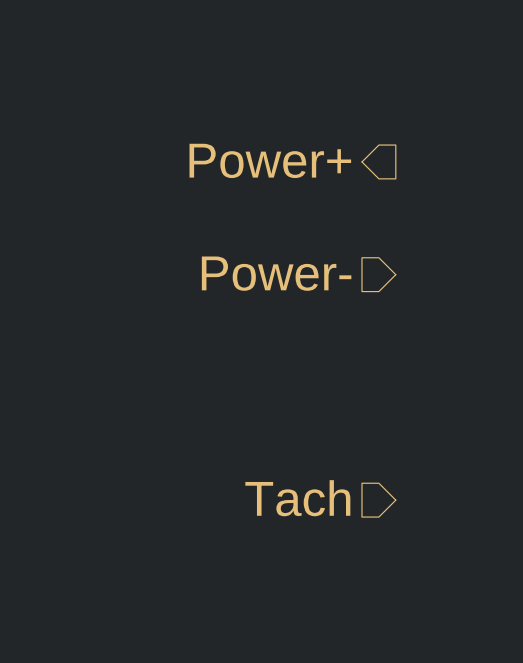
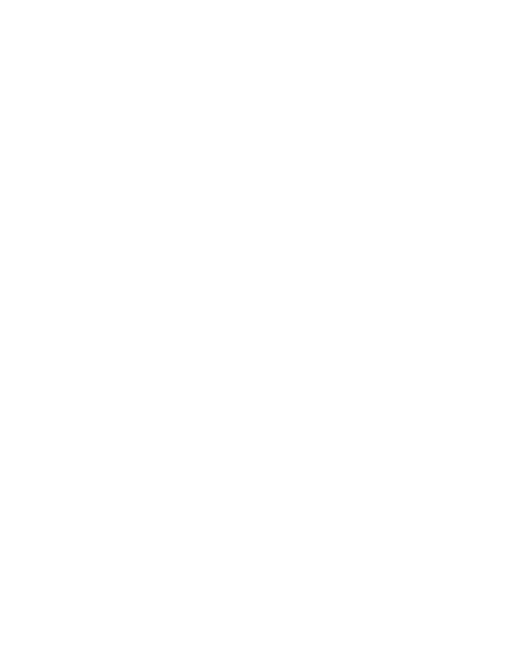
hierarchical label: Power+ (270, 160) -> none
hierarchical label: Power- (276, 273) -> none
hierarchical label: Tach (297, 498) -> none

